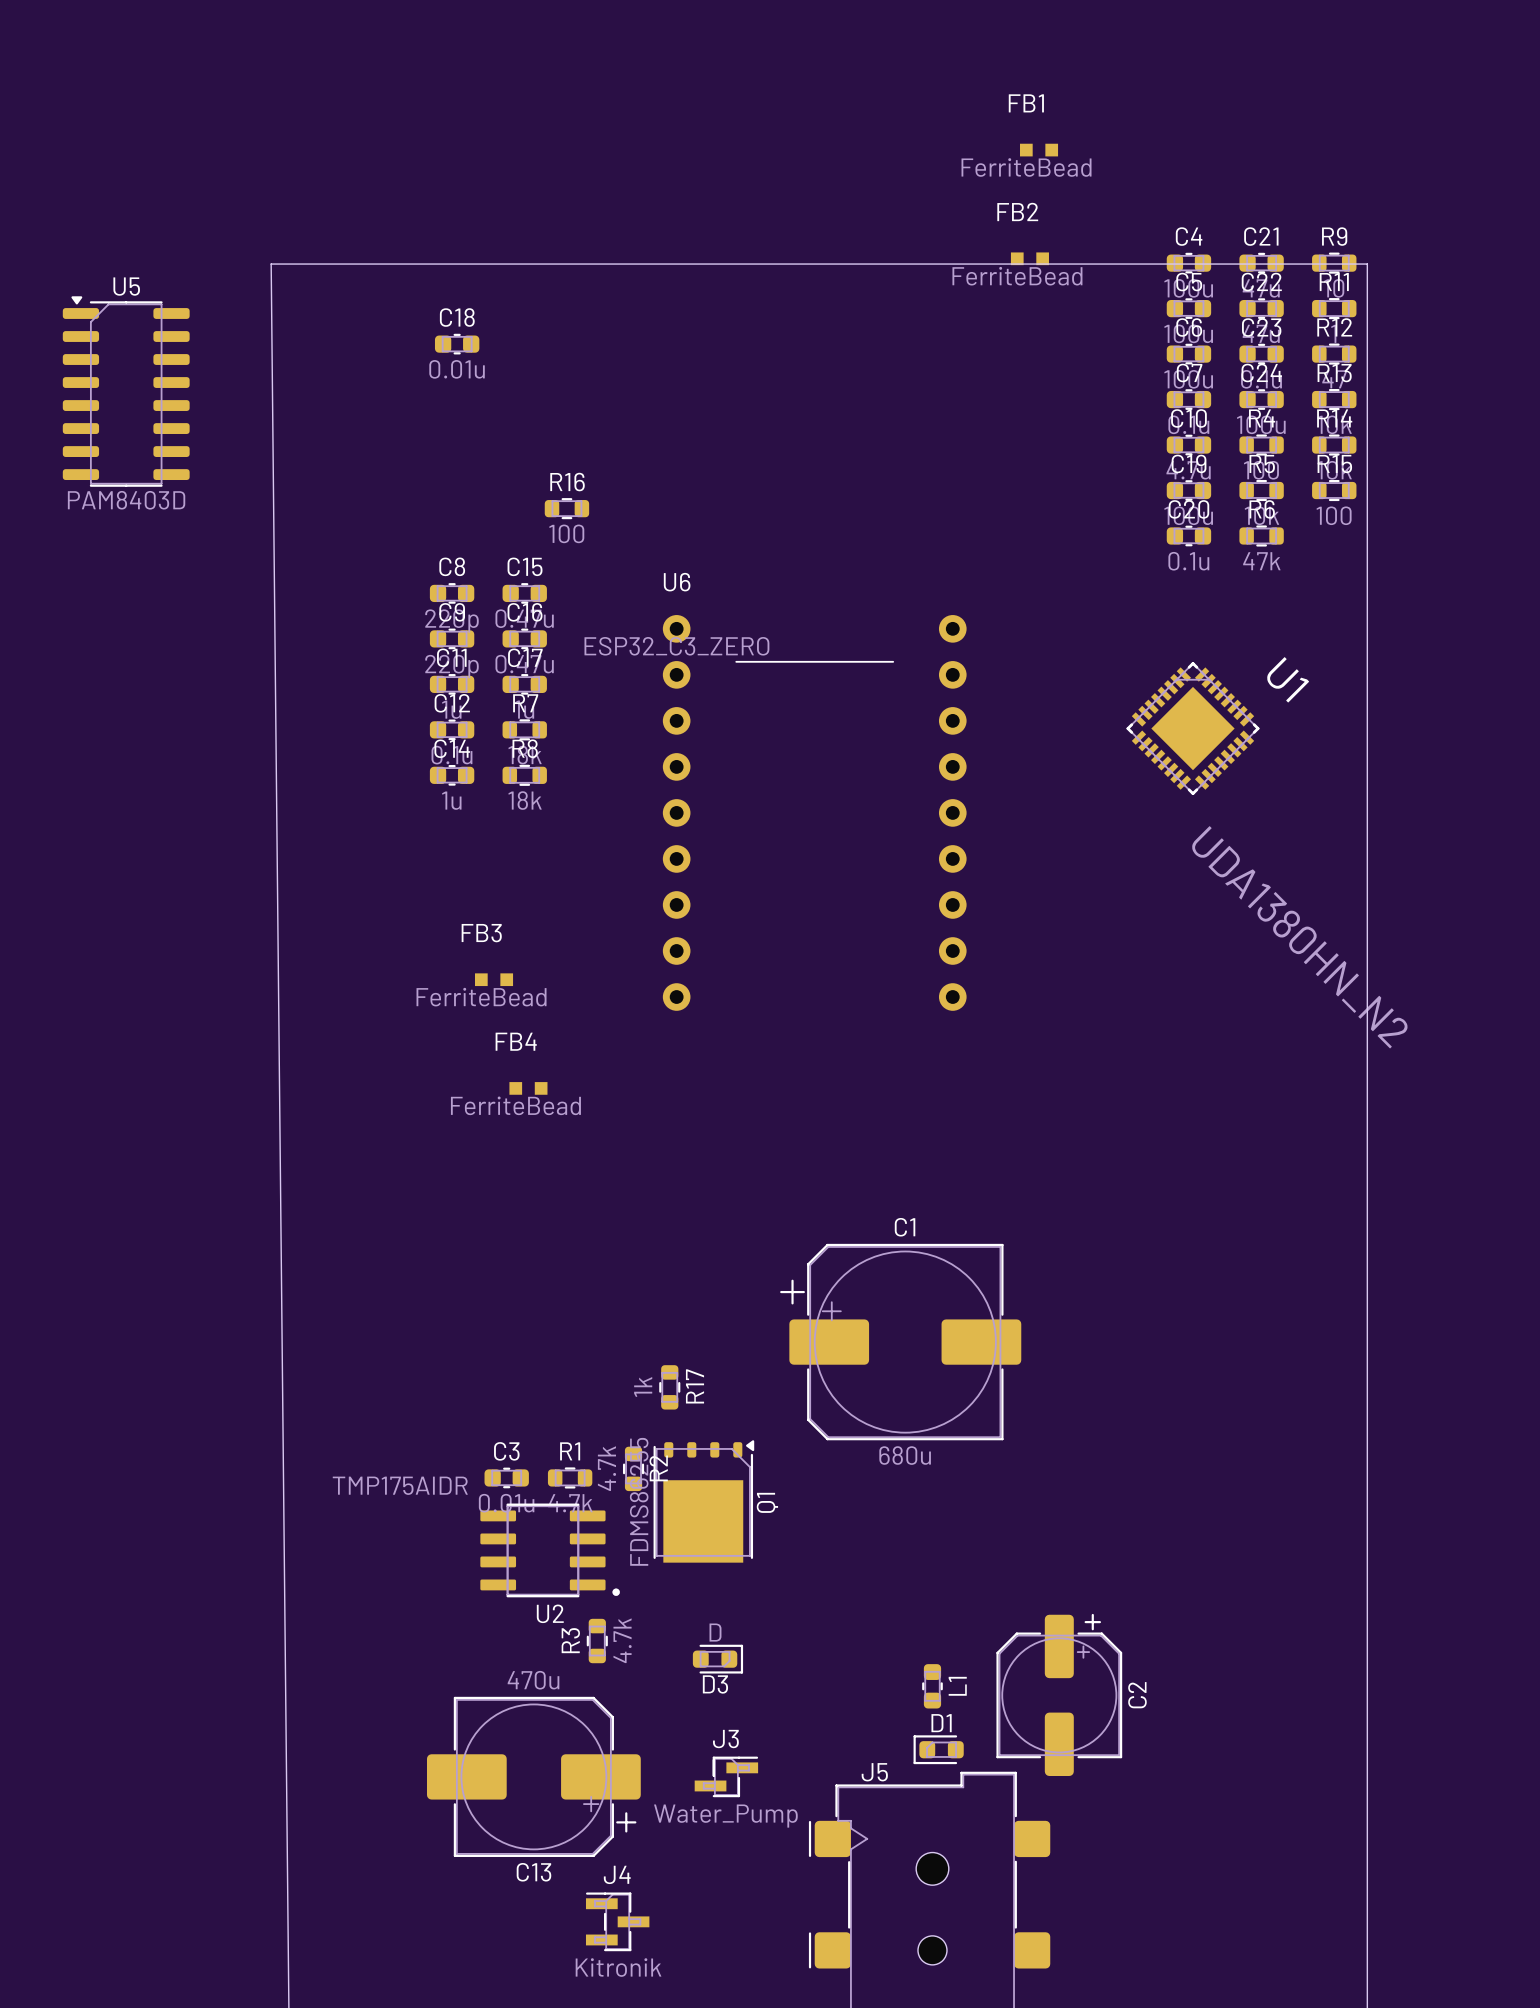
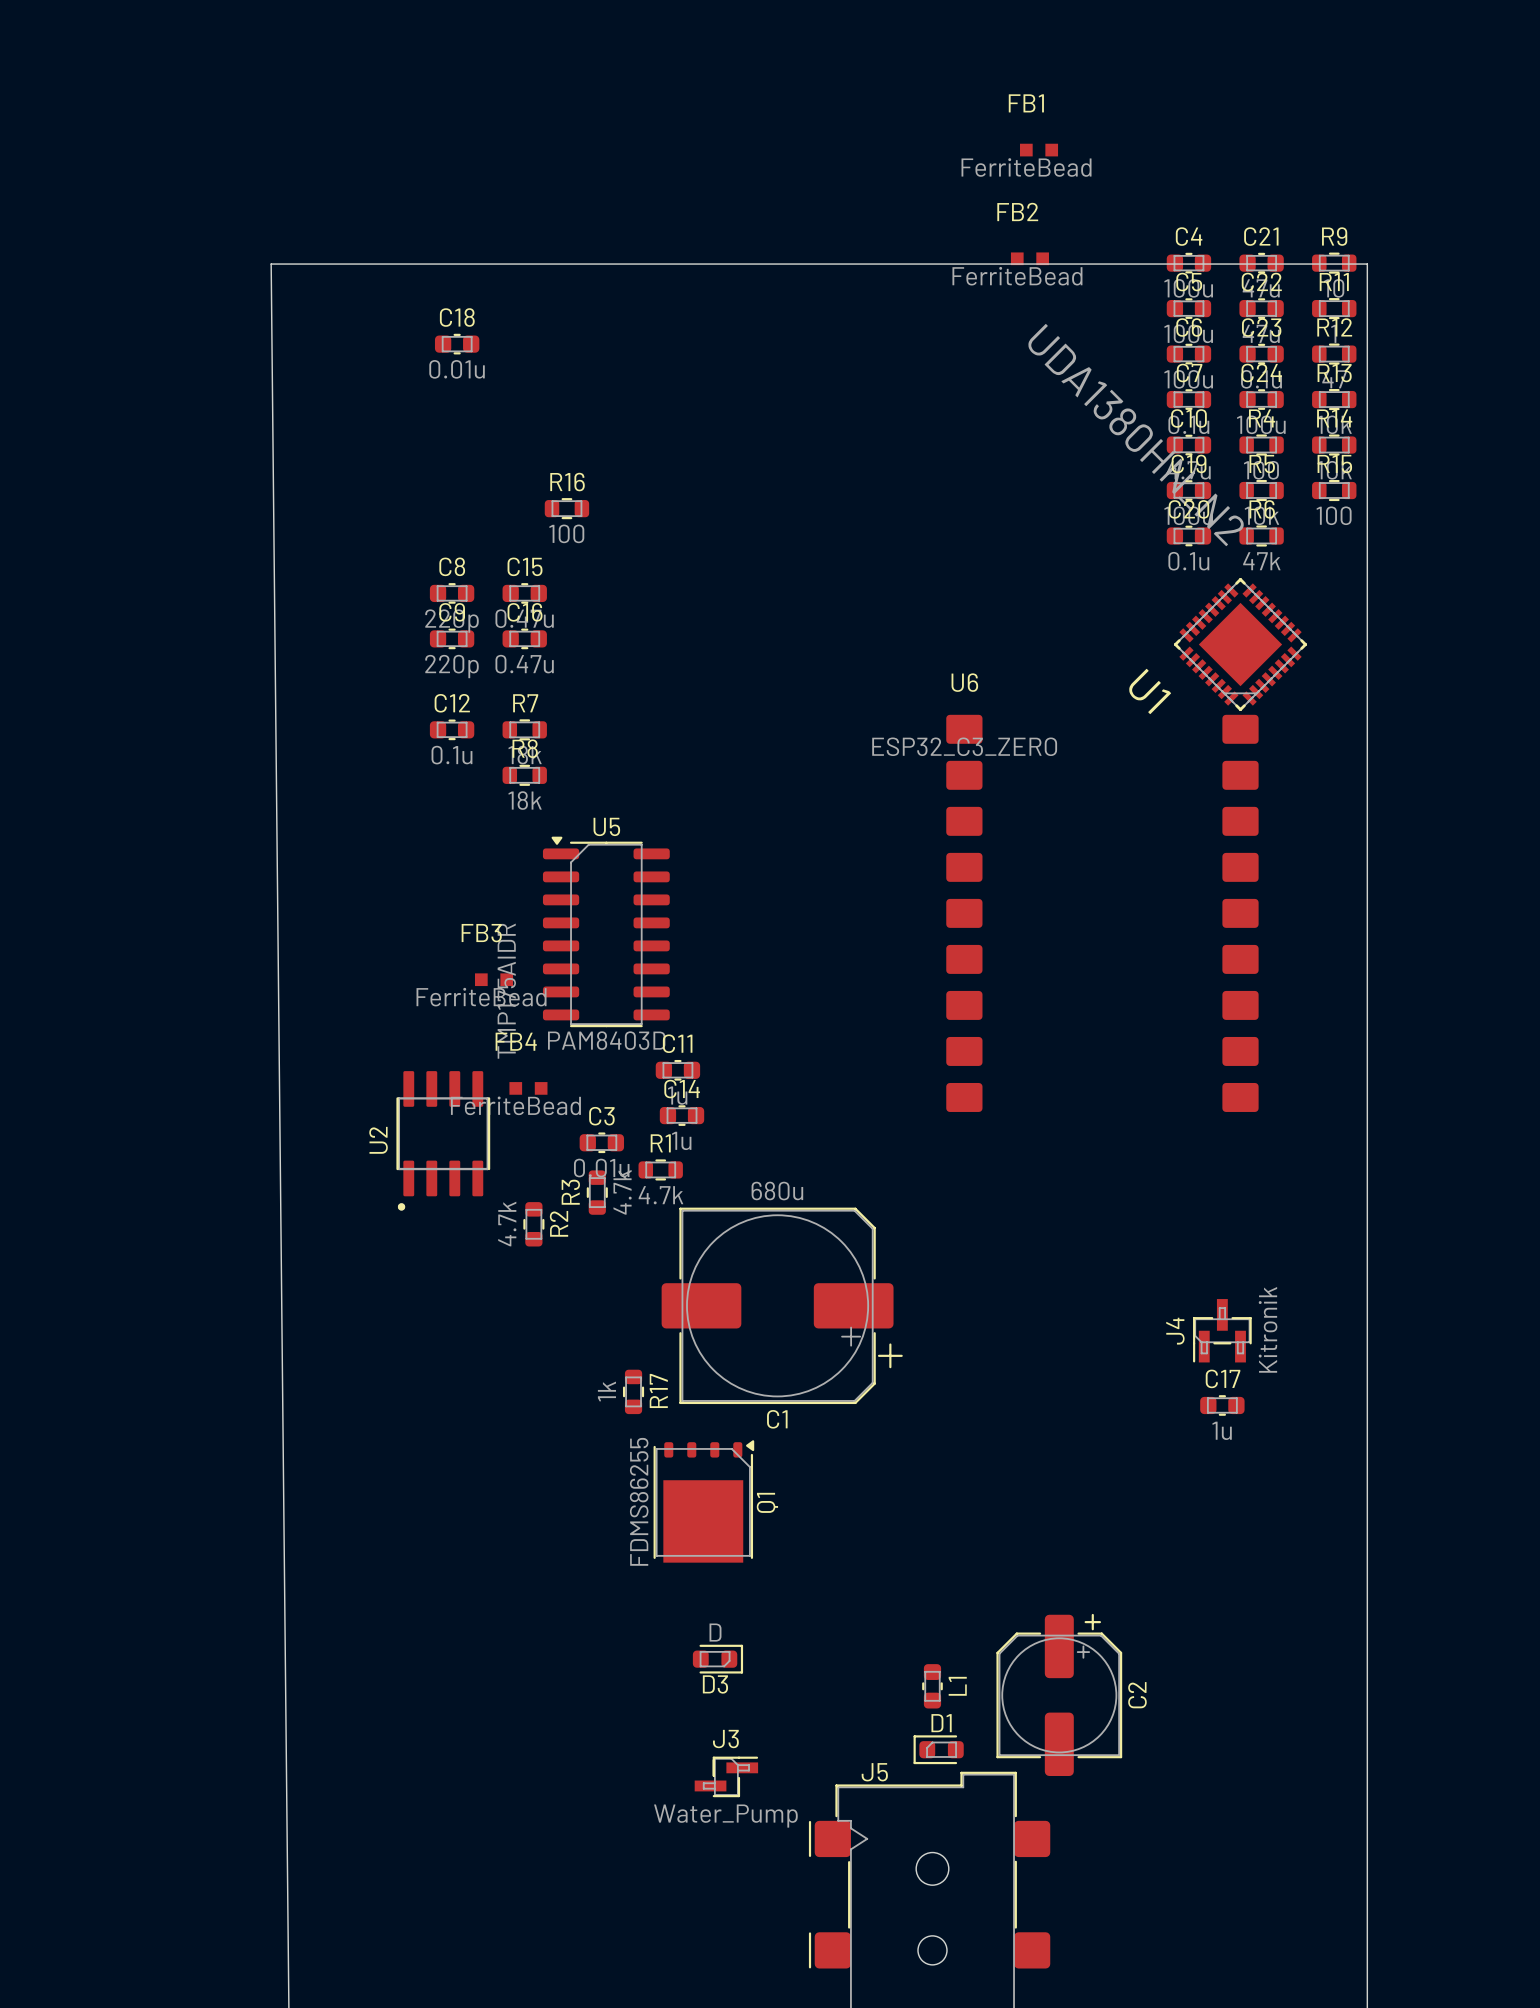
U5 position: (126, 391) -> (606, 931)
U6 footprint: [662, 615, 967, 1011] -> [946, 714, 1259, 1112]
C11 position: (452, 684) -> (677, 1070)
C17 position: (524, 684) -> (1222, 1405)
U1 rotation: 0° (1192, 728) -> 180° (1240, 644)
U1 position: (1192, 728) -> (1240, 644)
C14 position: (452, 775) -> (682, 1115)
C1 rotation: 0° (900, 1342) -> 180° (782, 1305)
R17 position: (669, 1387) -> (633, 1391)
R2 position: (633, 1468) -> (533, 1224)
C3 position: (506, 1477) -> (601, 1142)
R1 position: (570, 1477) -> (660, 1169)
U2 rotation: 0° (550, 1550) -> 90° clockwise (443, 1140)
U2 position: (550, 1550) -> (443, 1140)
R3 position: (597, 1641) -> (597, 1192)
C13: 470u (533, 1776) -> none
J4 rotation: 0° (617, 1921) -> 90° counterclockwise (1222, 1330)
J4 position: (617, 1921) -> (1222, 1330)

